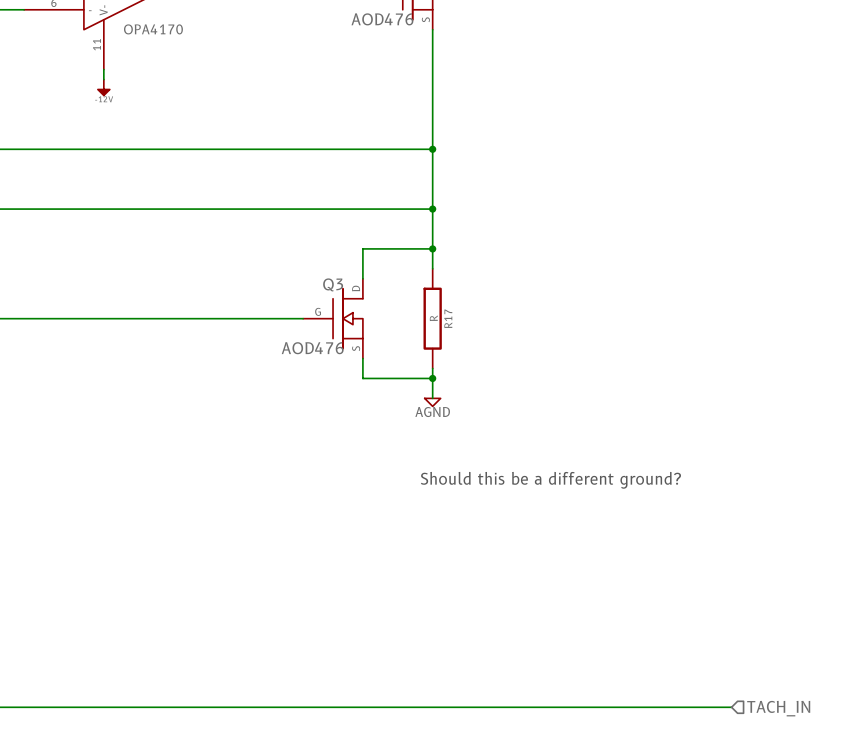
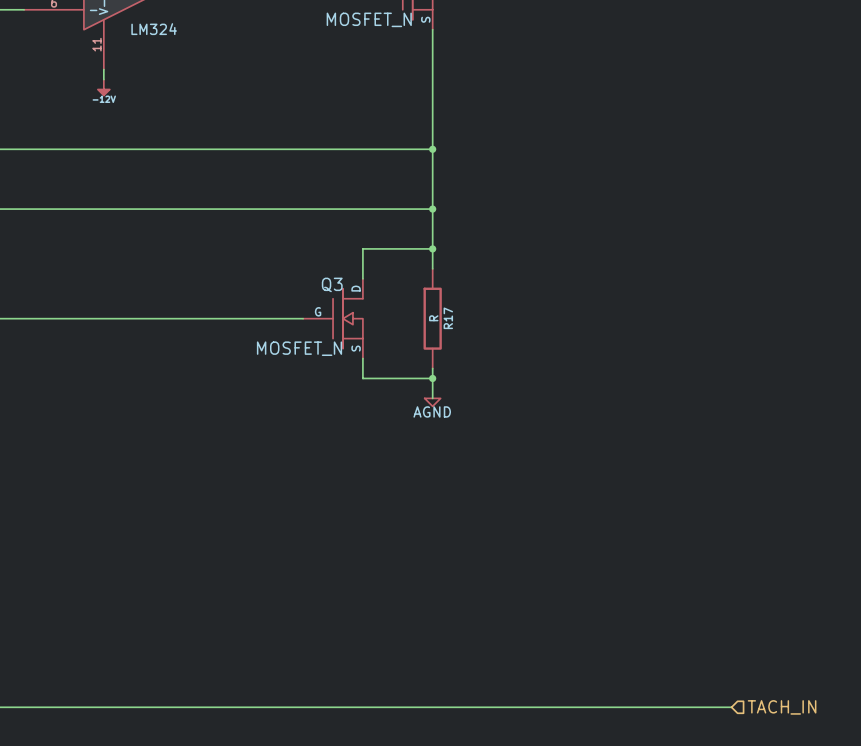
part value: AOD476 (382, 19) -> MOSFET_N (369, 19)
part value: OPA4170 (153, 29) -> LM324 (154, 29)
Q3 value: AOD476 (312, 348) -> MOSFET_N (299, 348)
text: Should this be a different ground? (550, 480) -> none

